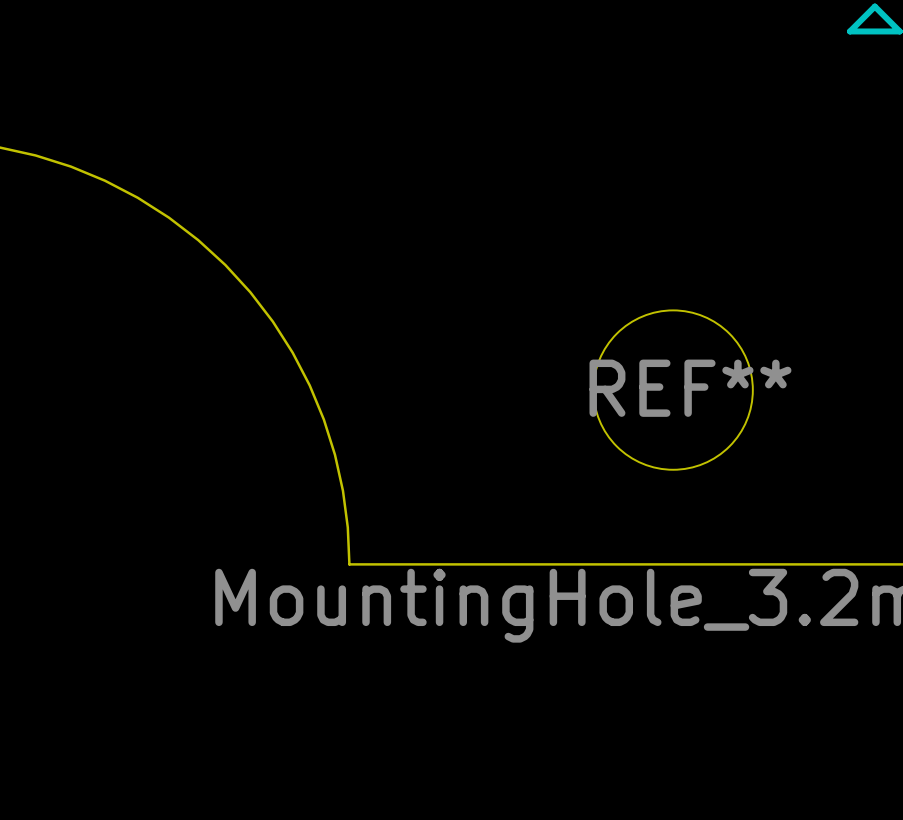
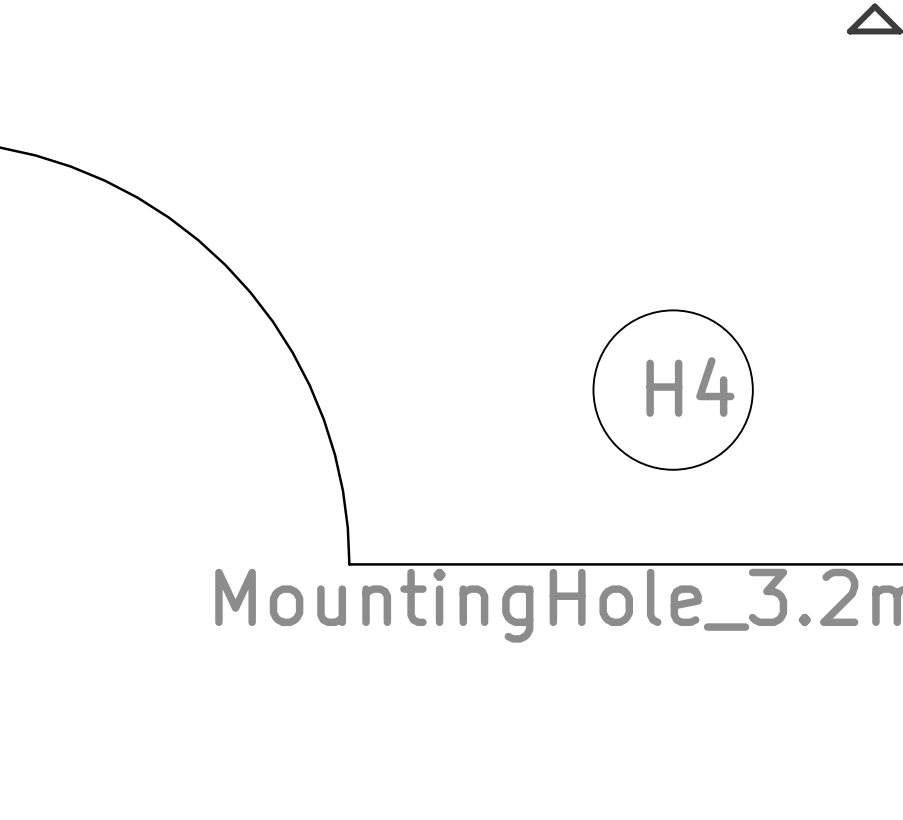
REF** name: REF** (690, 388) -> H4 (690, 387)

